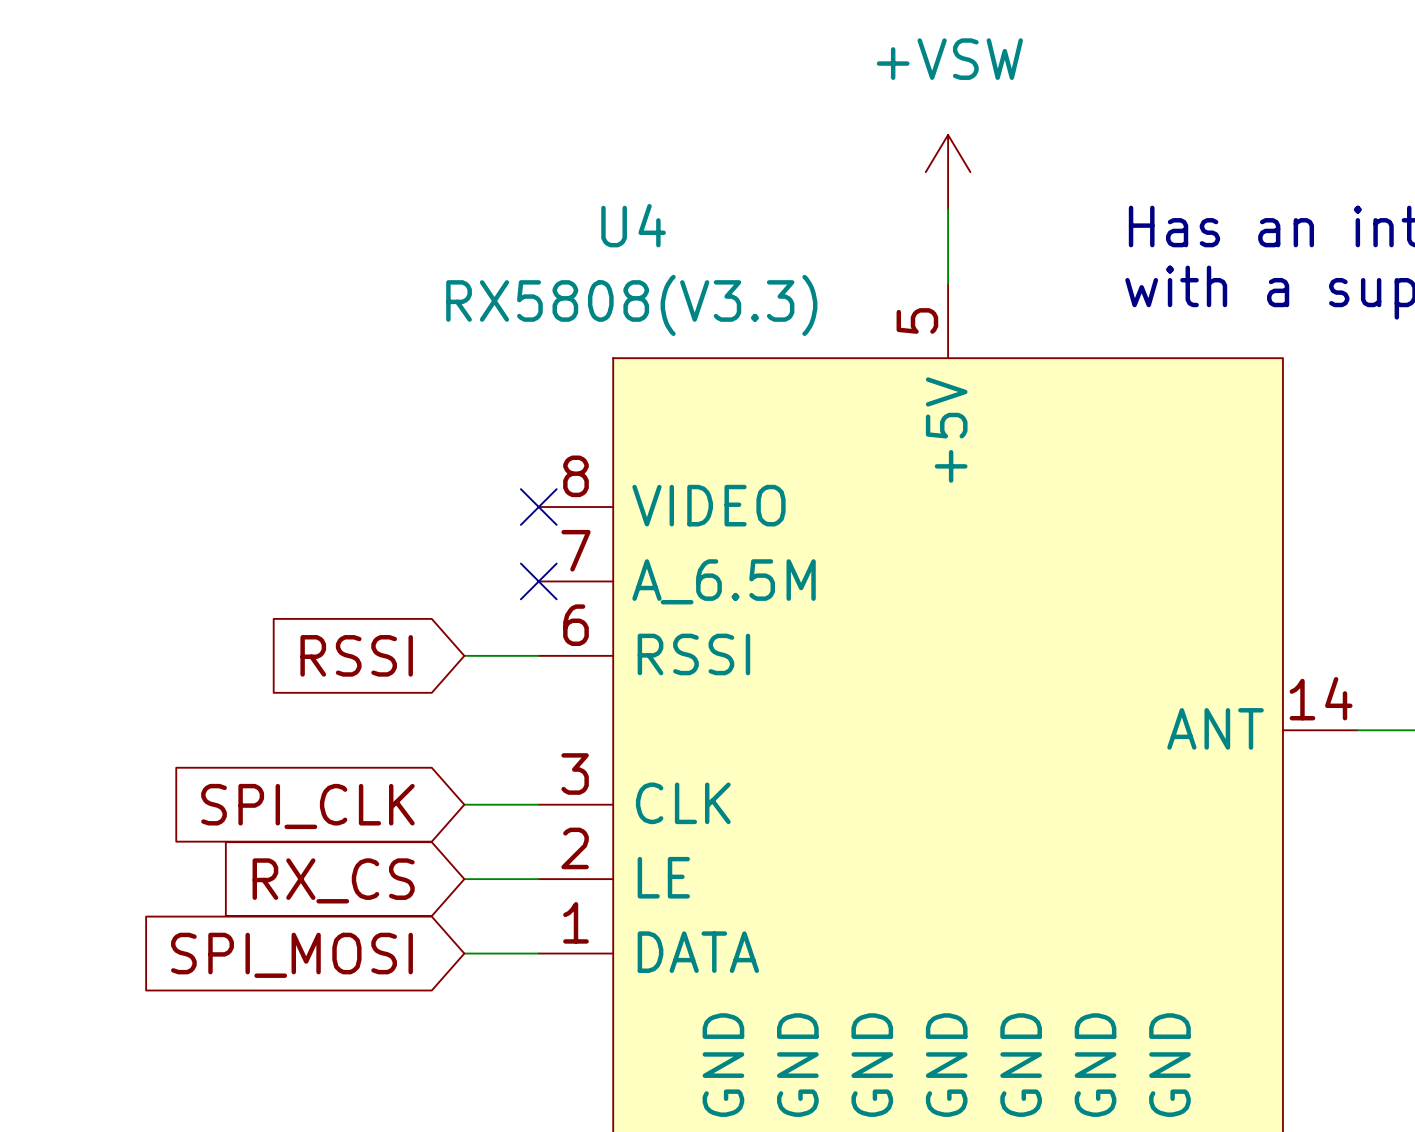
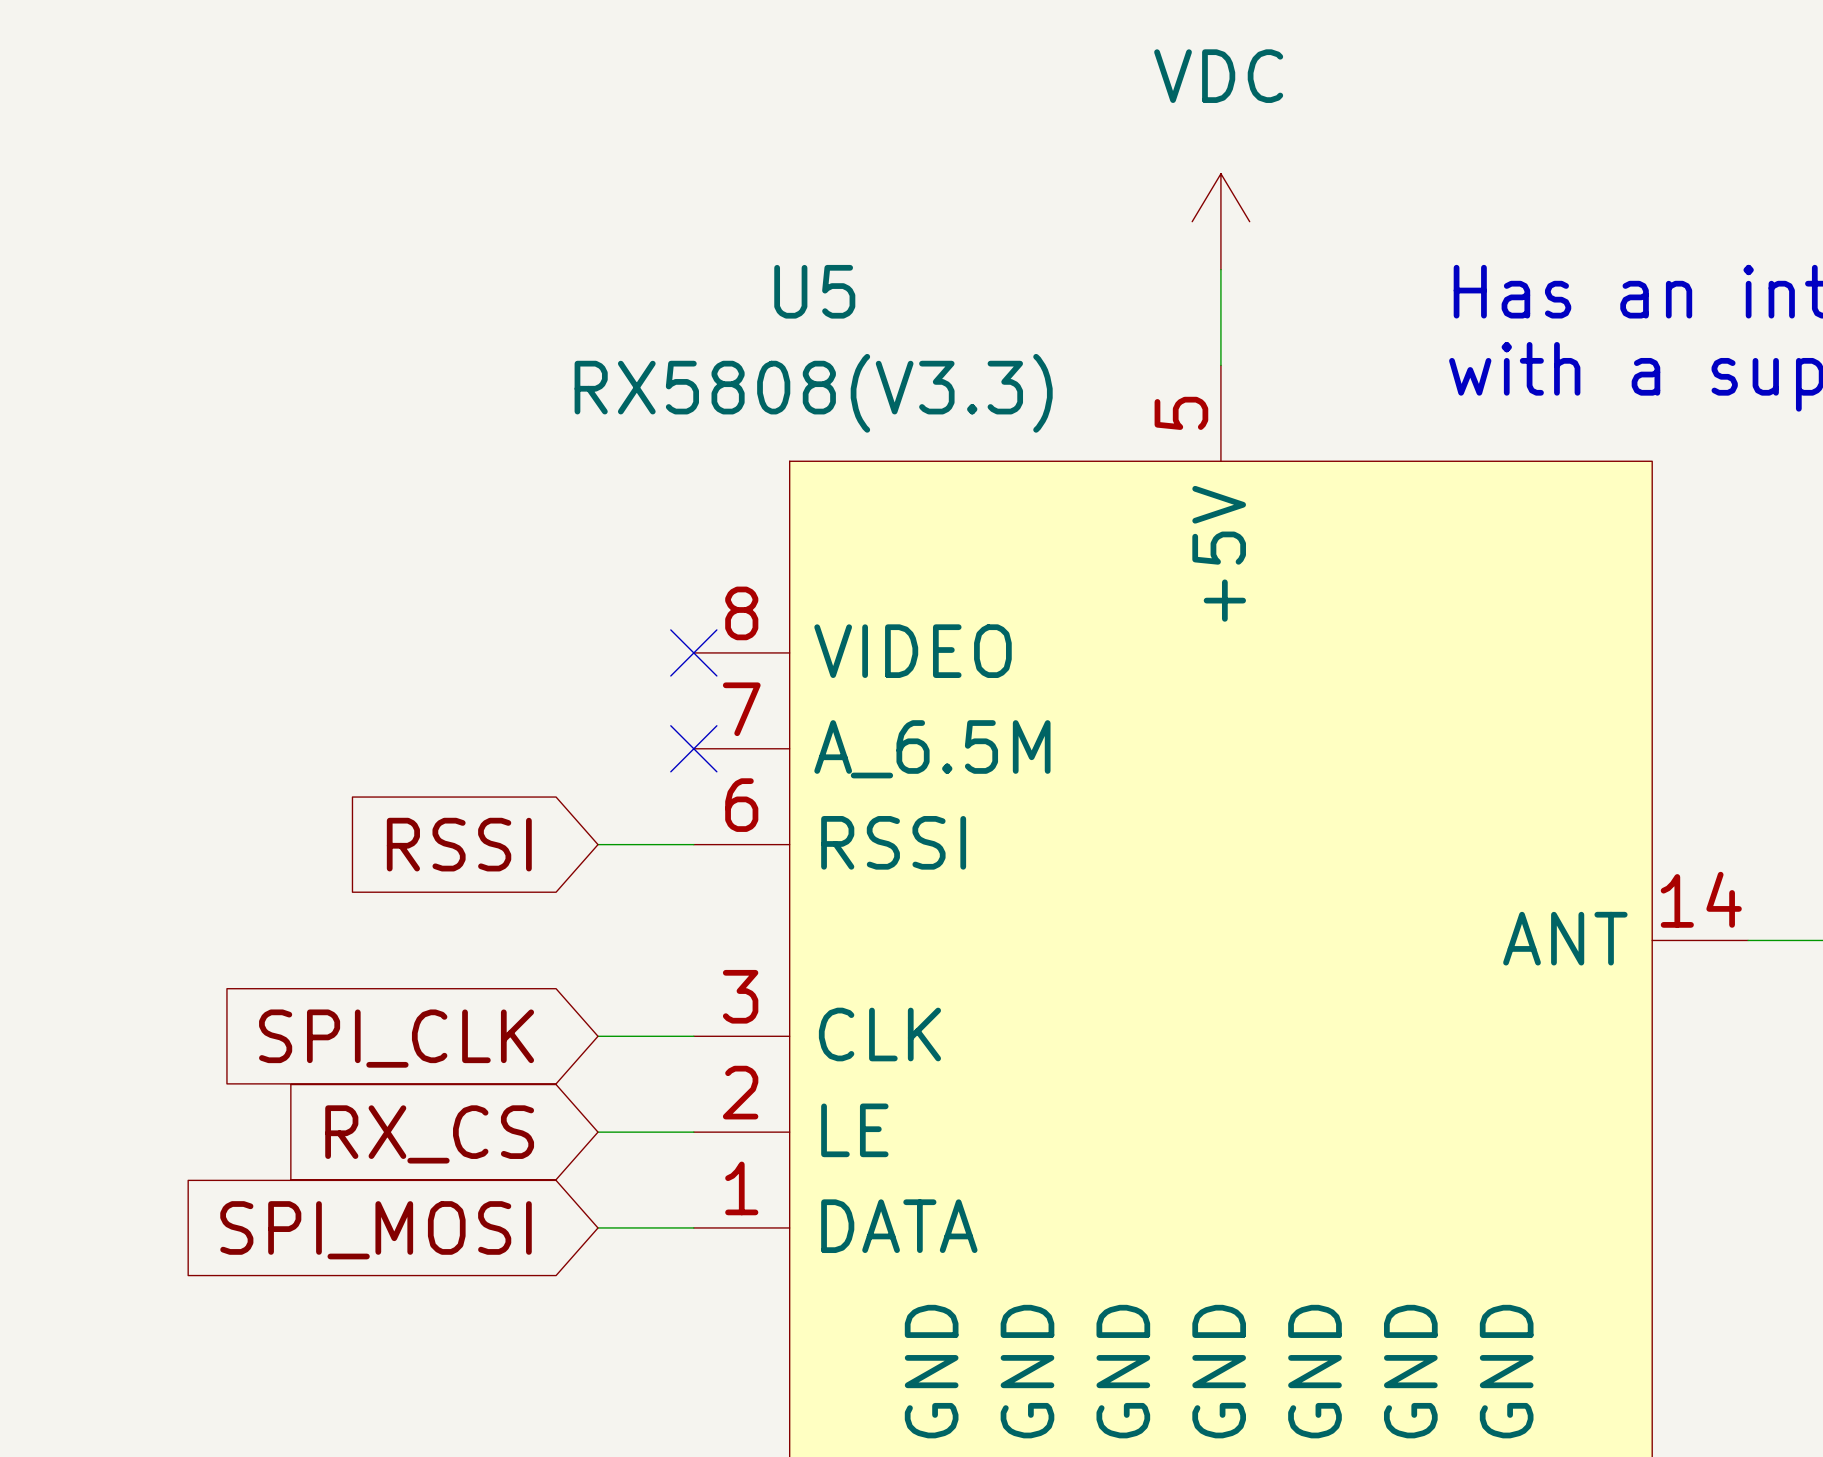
power symbol: +VSW (948, 172) -> VDC (1220, 221)
U4 name: U4 (633, 225) -> U5 (814, 291)

